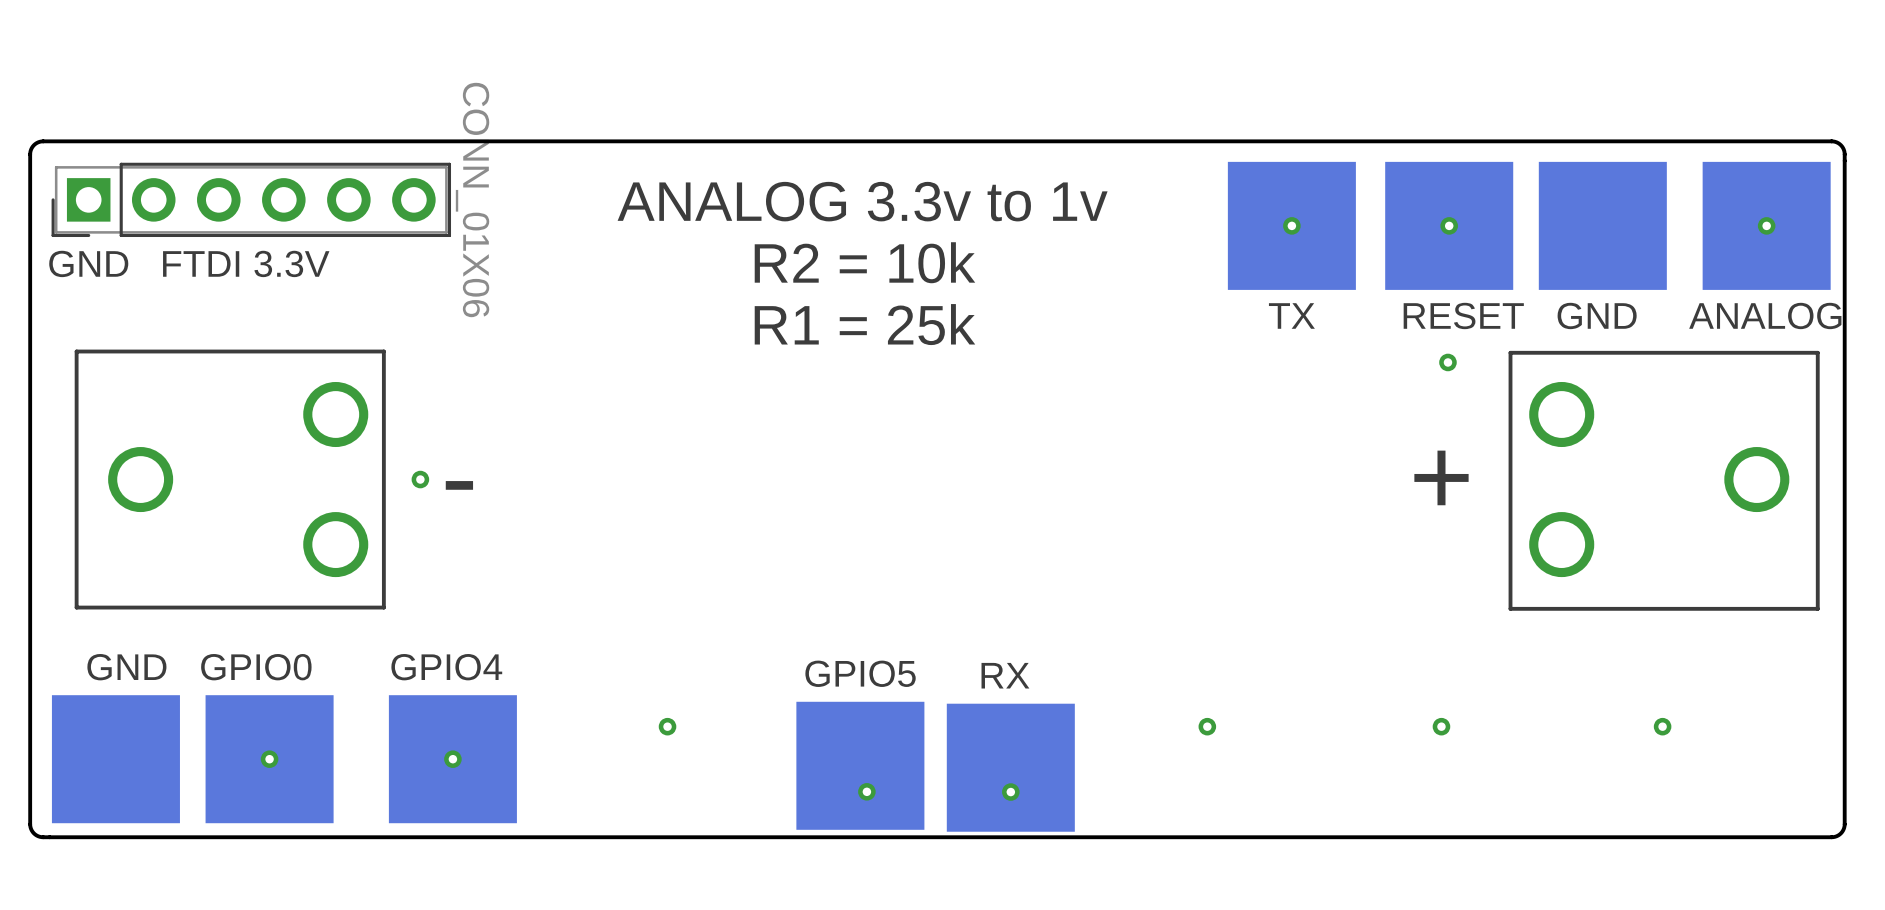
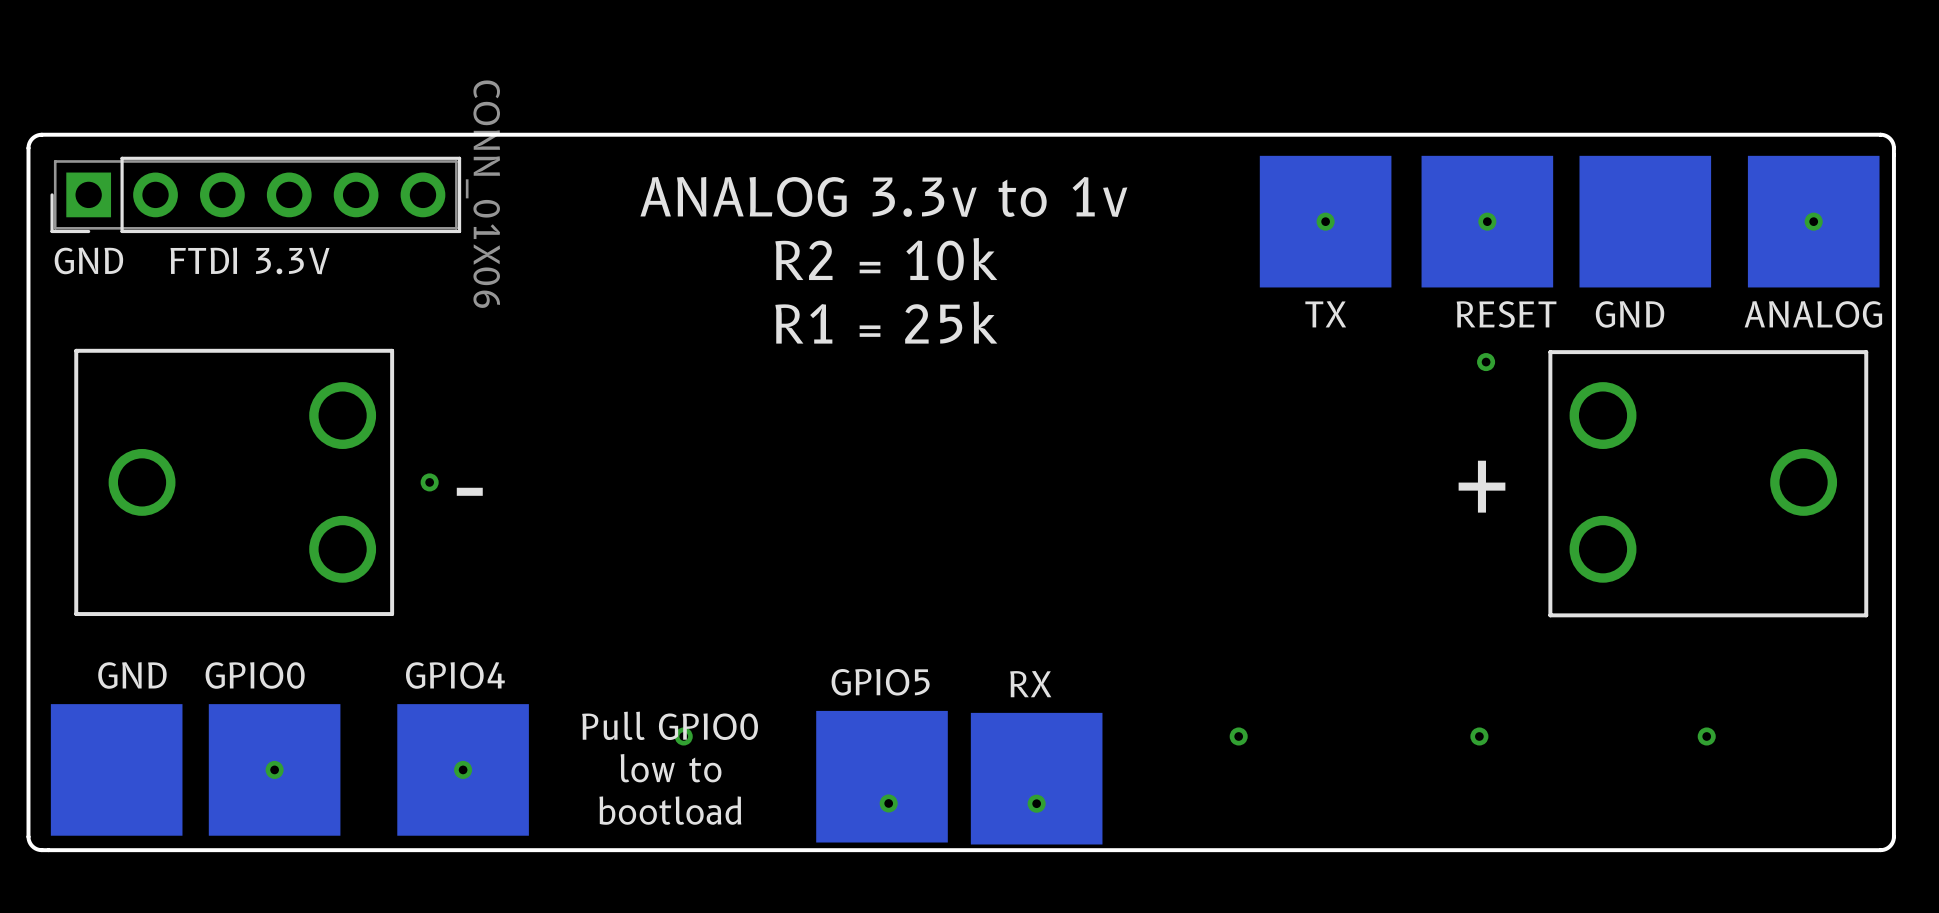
text: none -> Pull GPIO0 (670, 725)
text: none -> low to (671, 768)
text: none -> bootload (670, 810)

